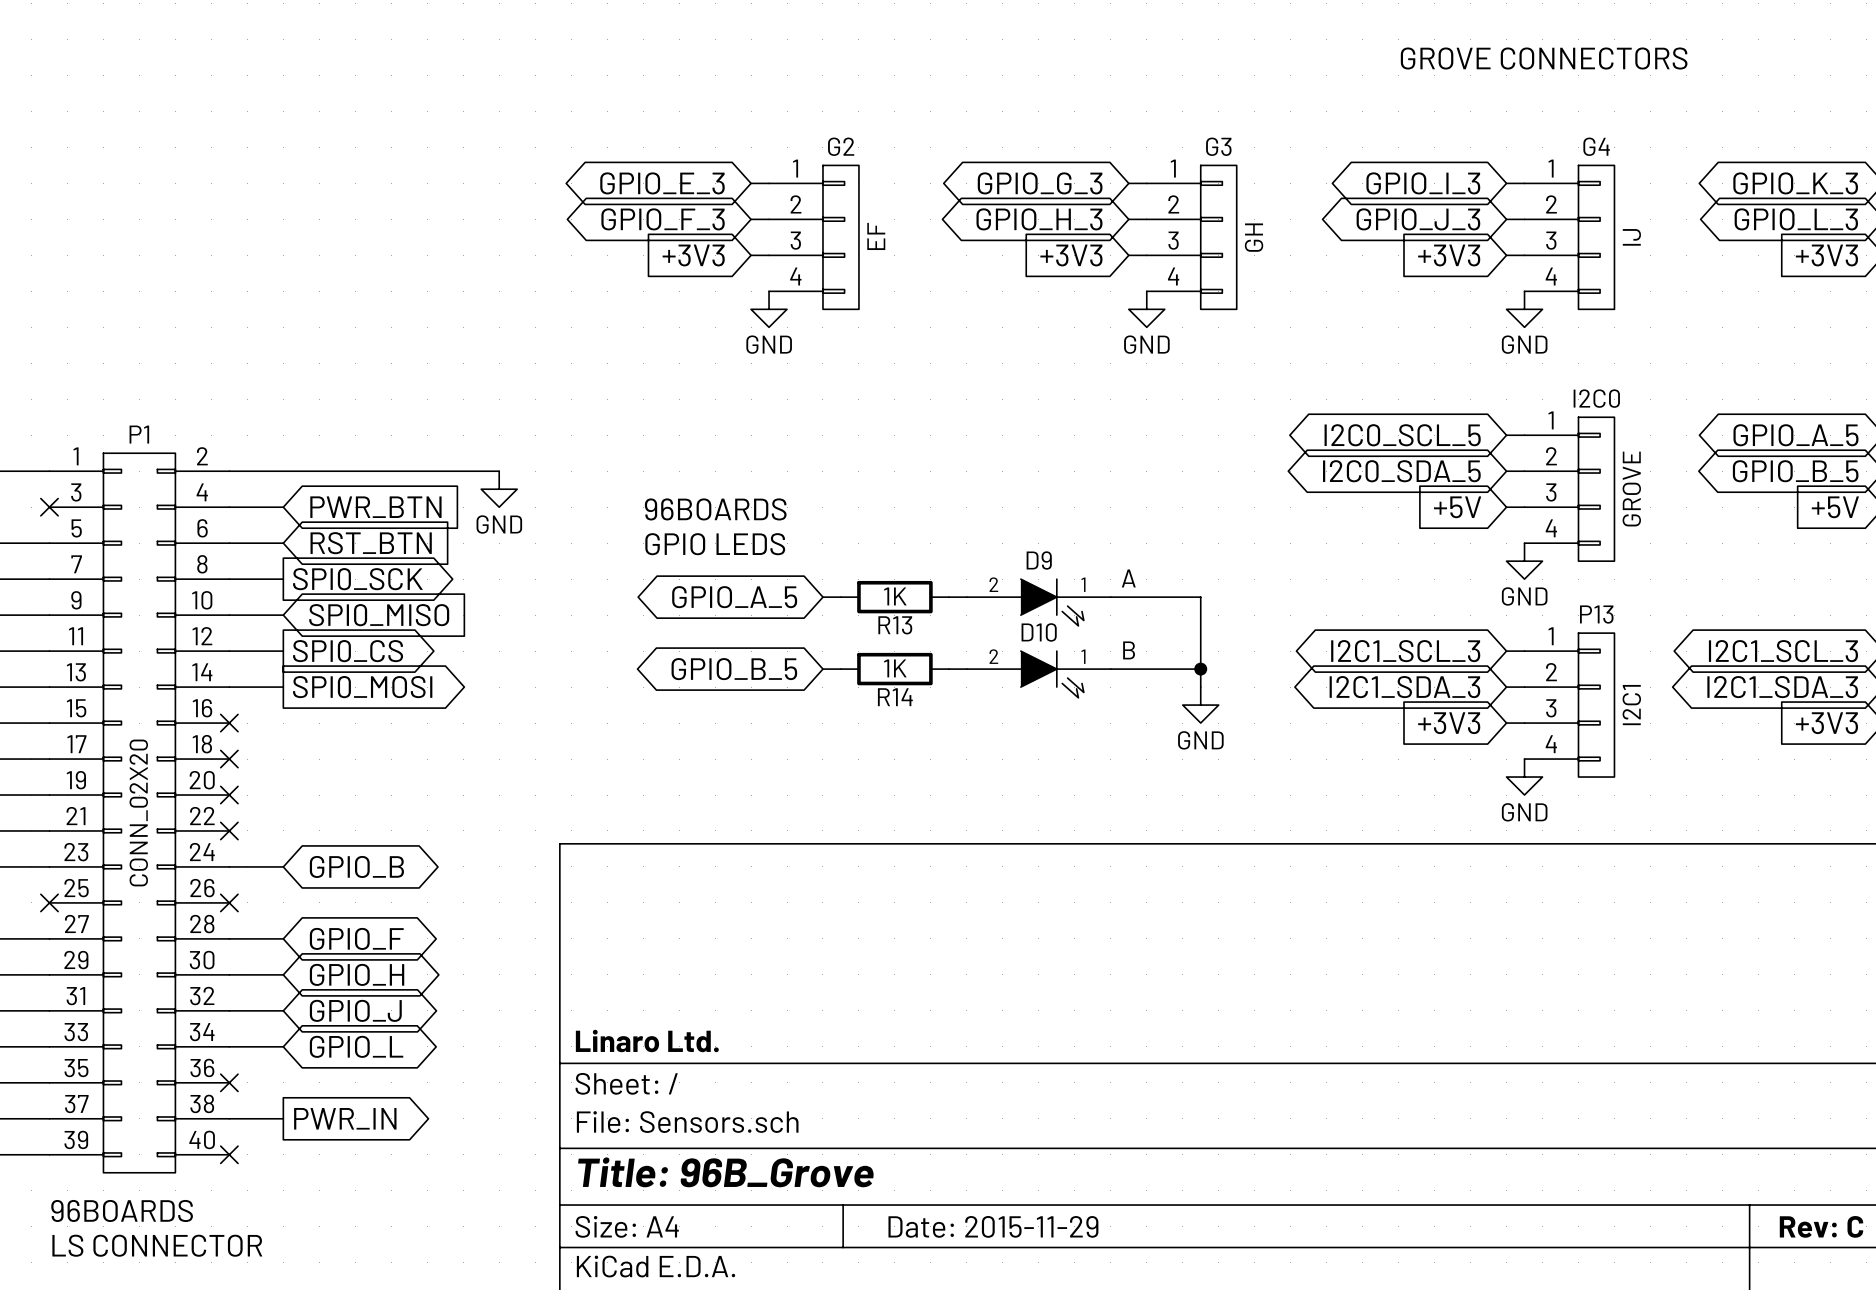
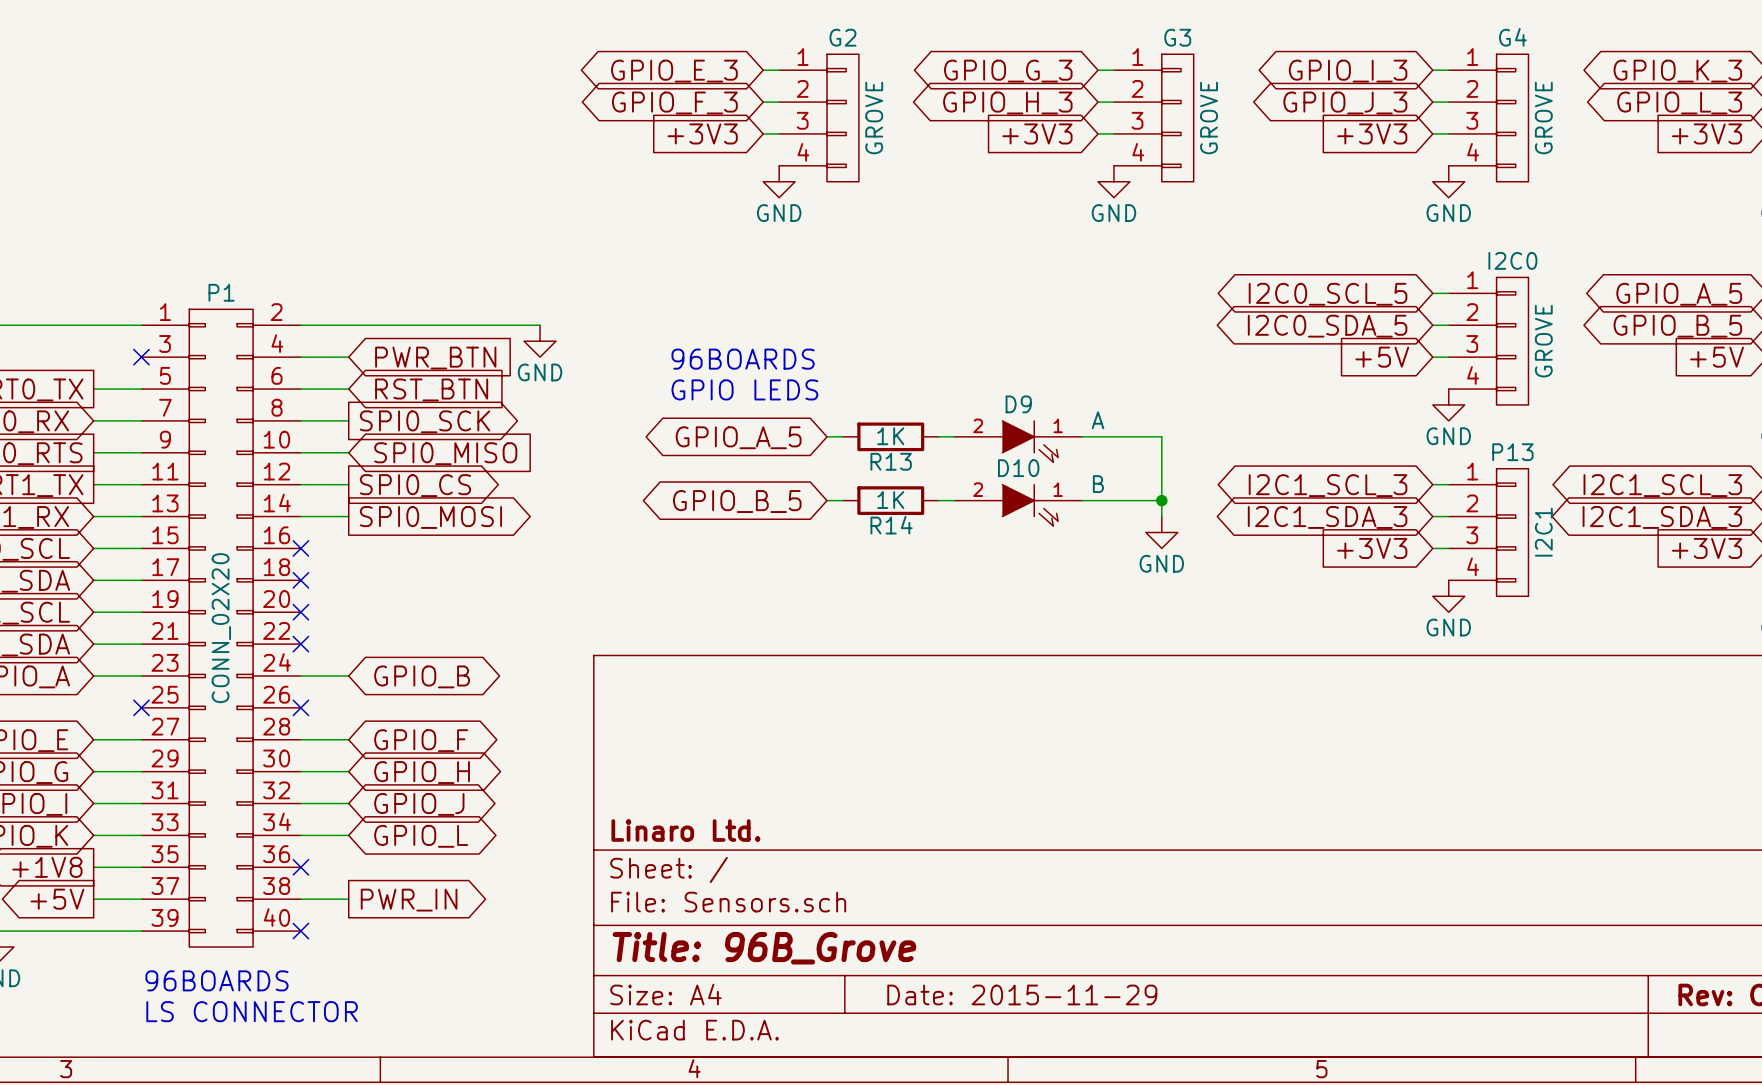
G2 value: EF (876, 236) -> GROVE (874, 118)
G3 value: GH (1254, 237) -> GROVE (1209, 118)
G4 value: IJ (1631, 237) -> GROVE (1543, 118)

